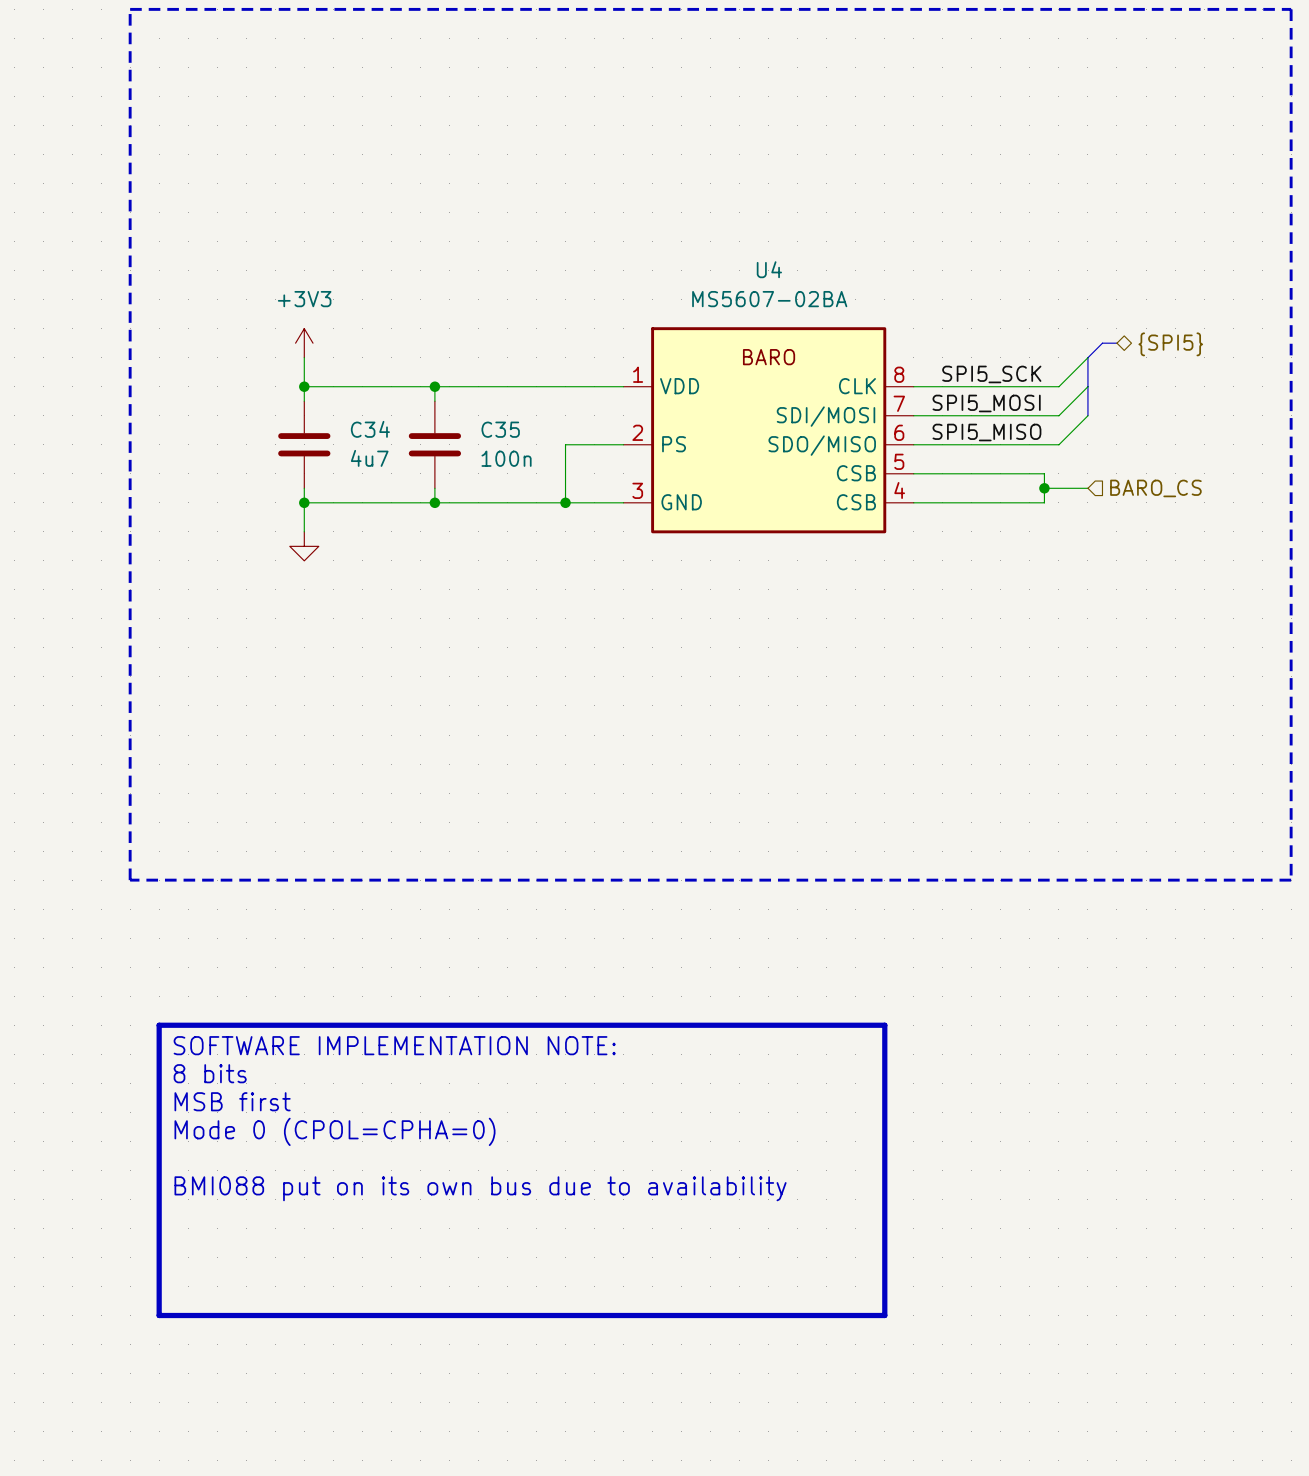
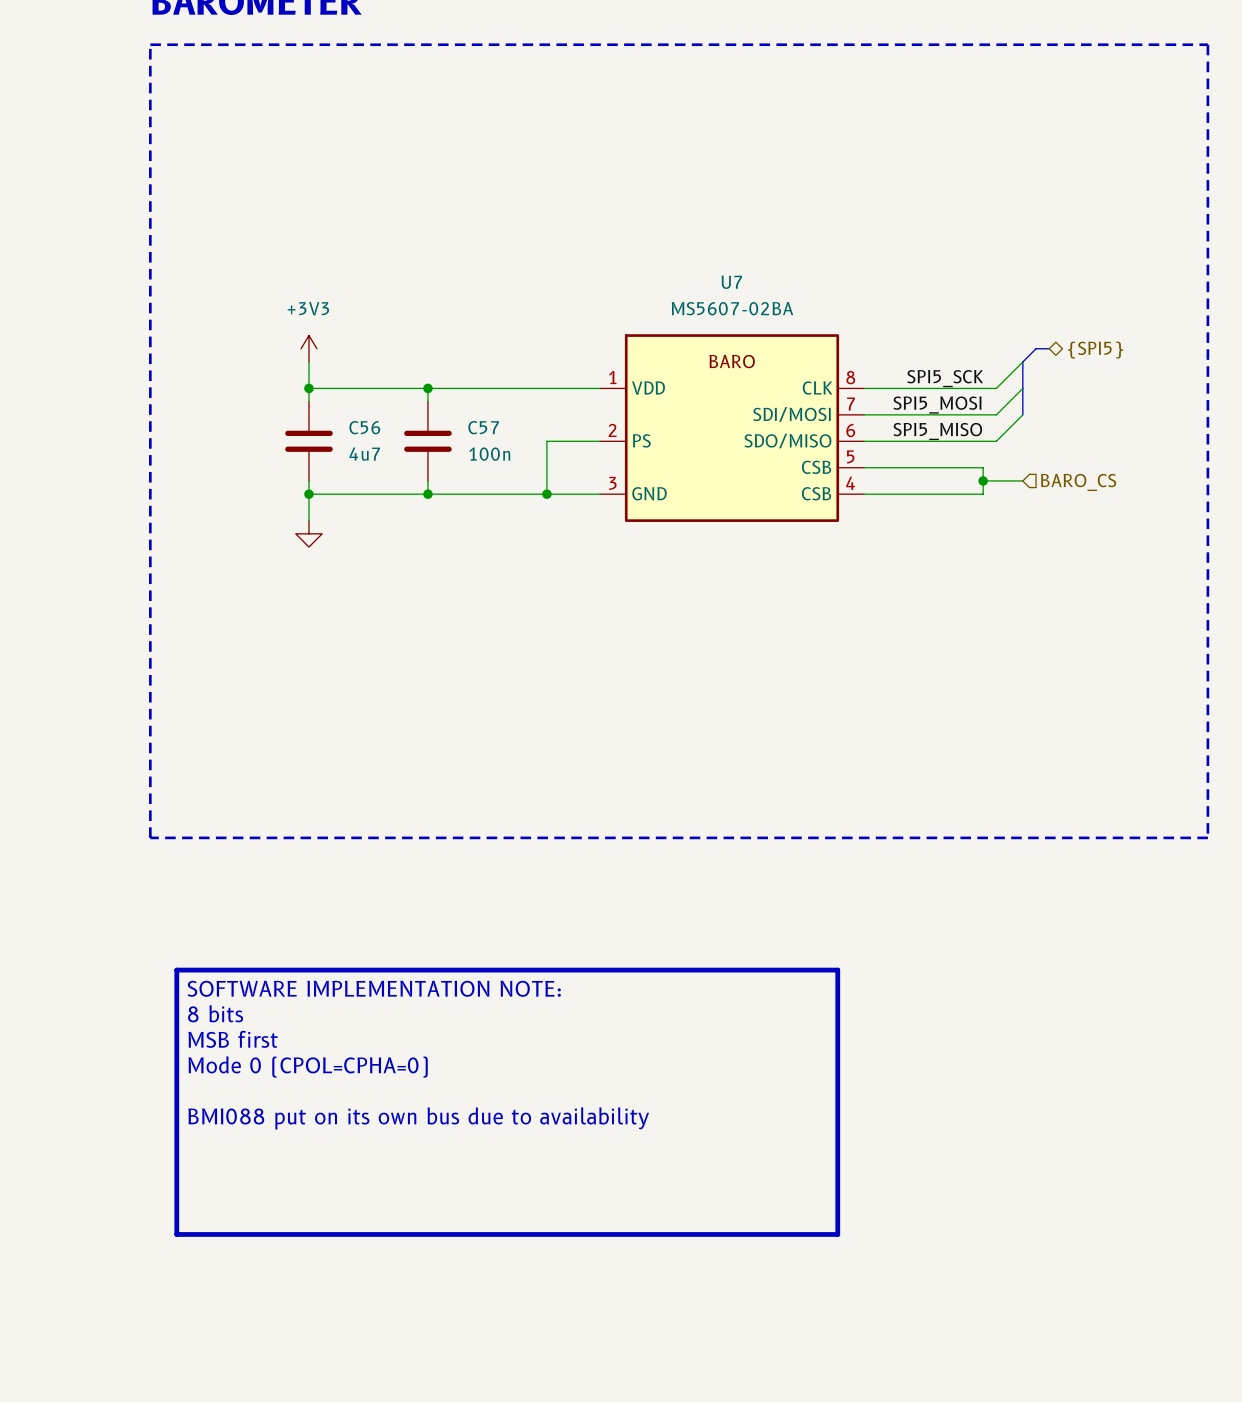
U4 name: U4 (769, 269) -> U7 (731, 282)
C34 name: C34 (370, 429) -> C56 (364, 427)
C35 name: C35 (500, 429) -> C57 (483, 427)

